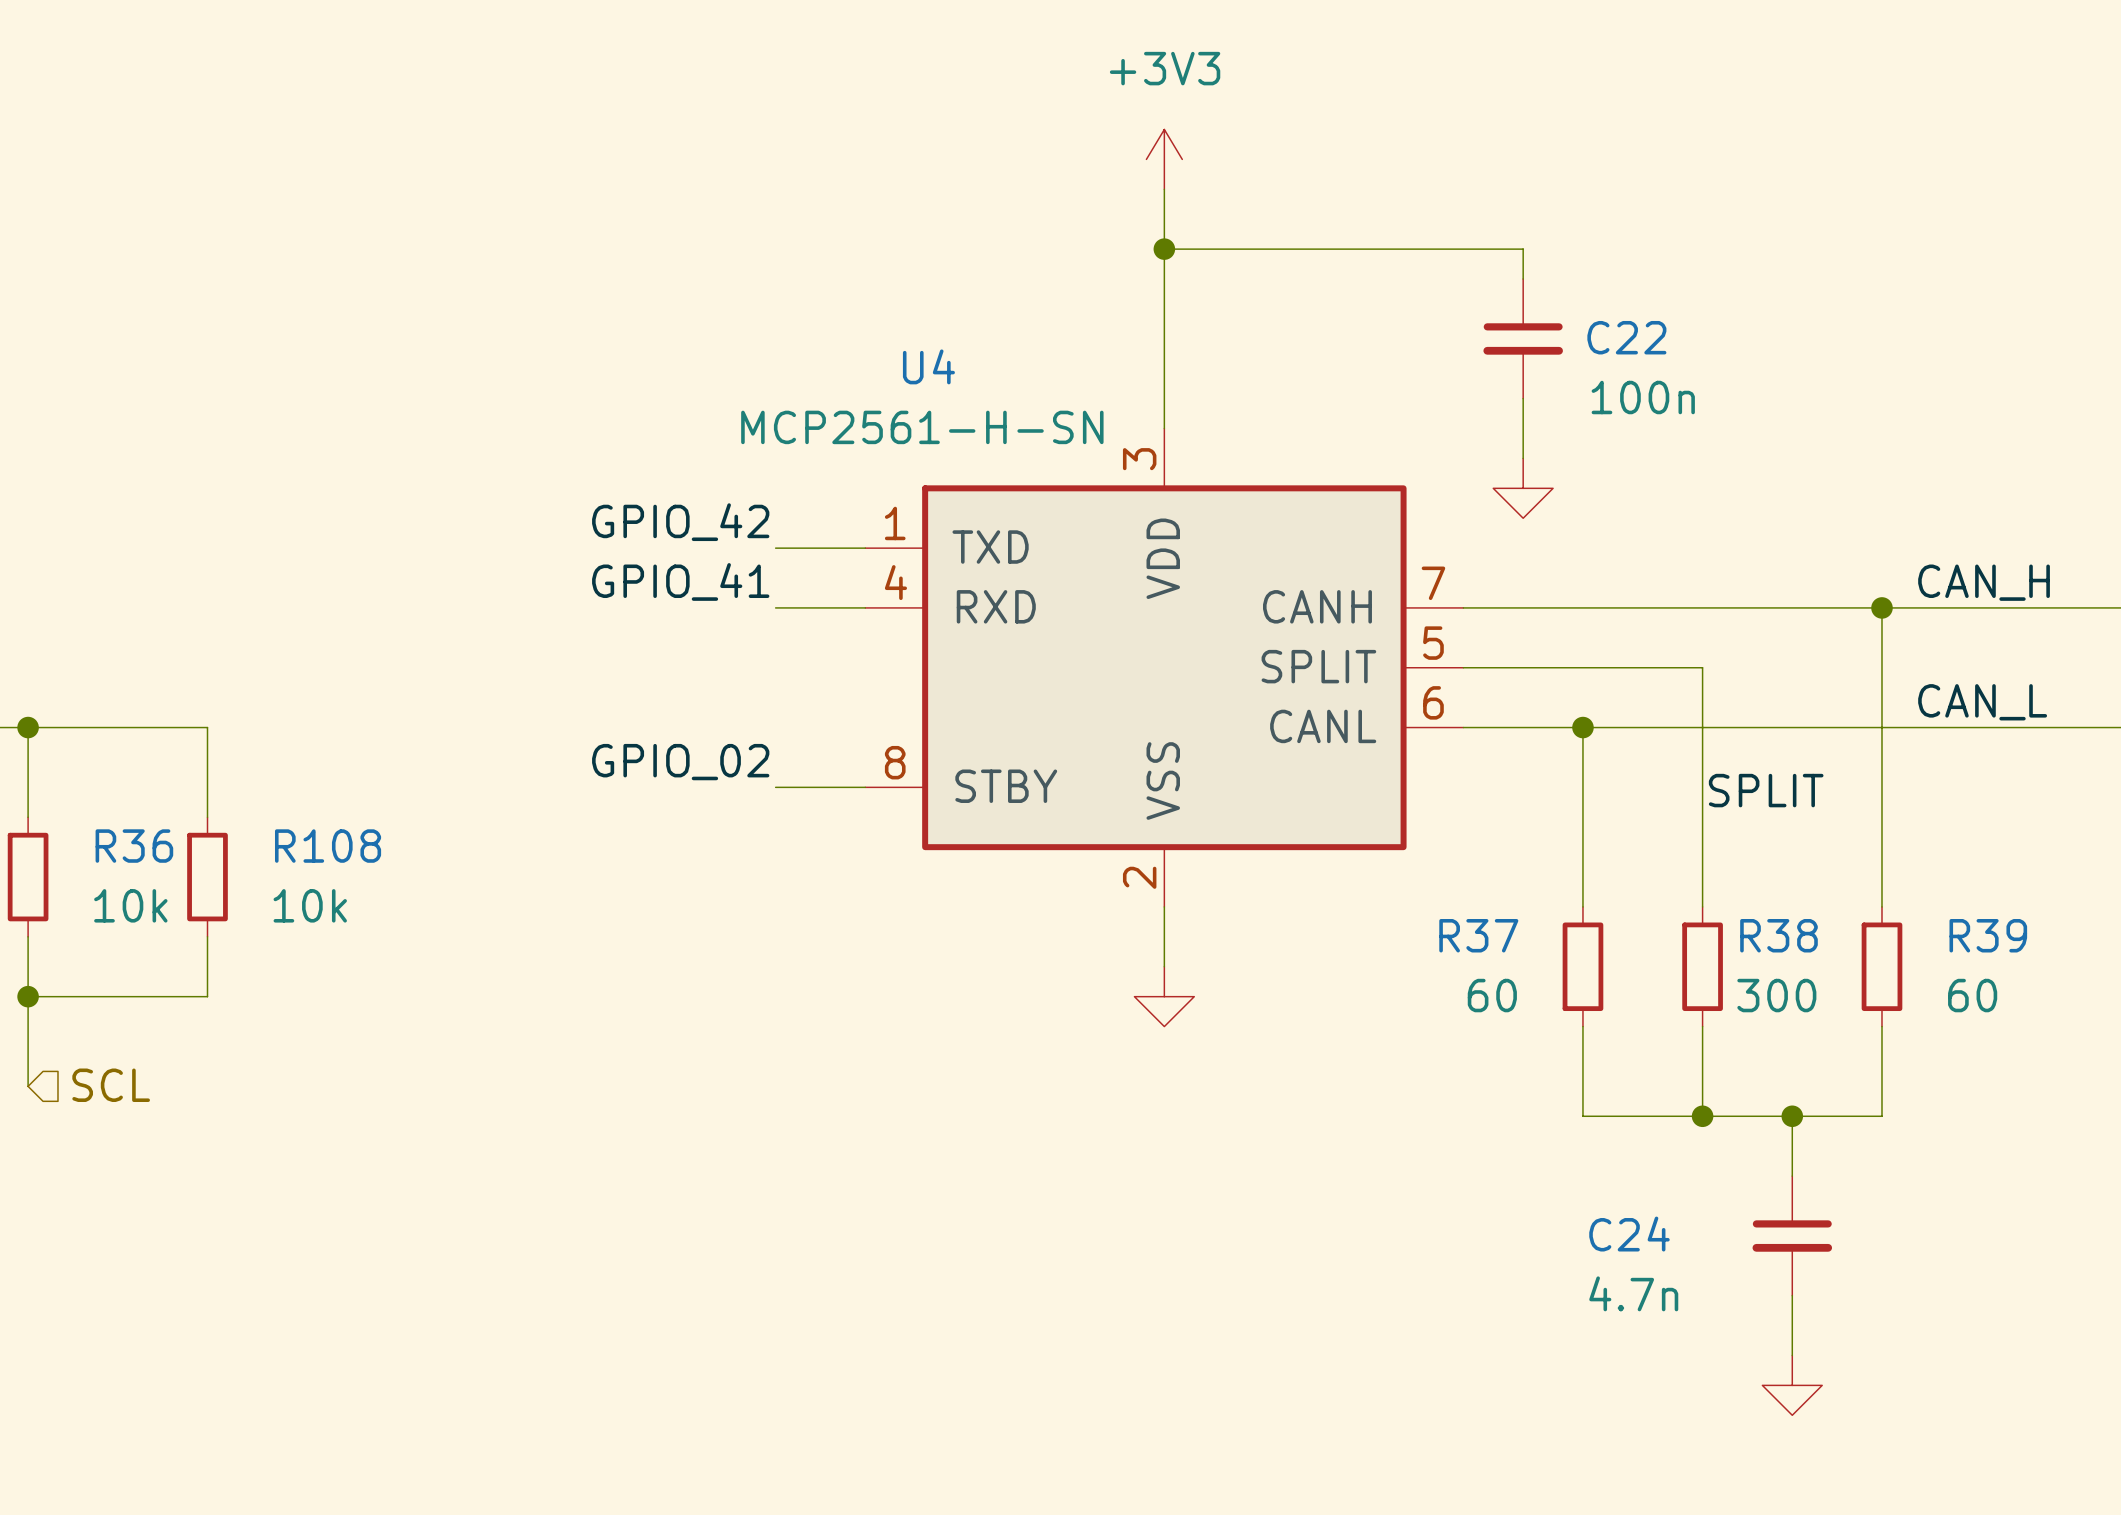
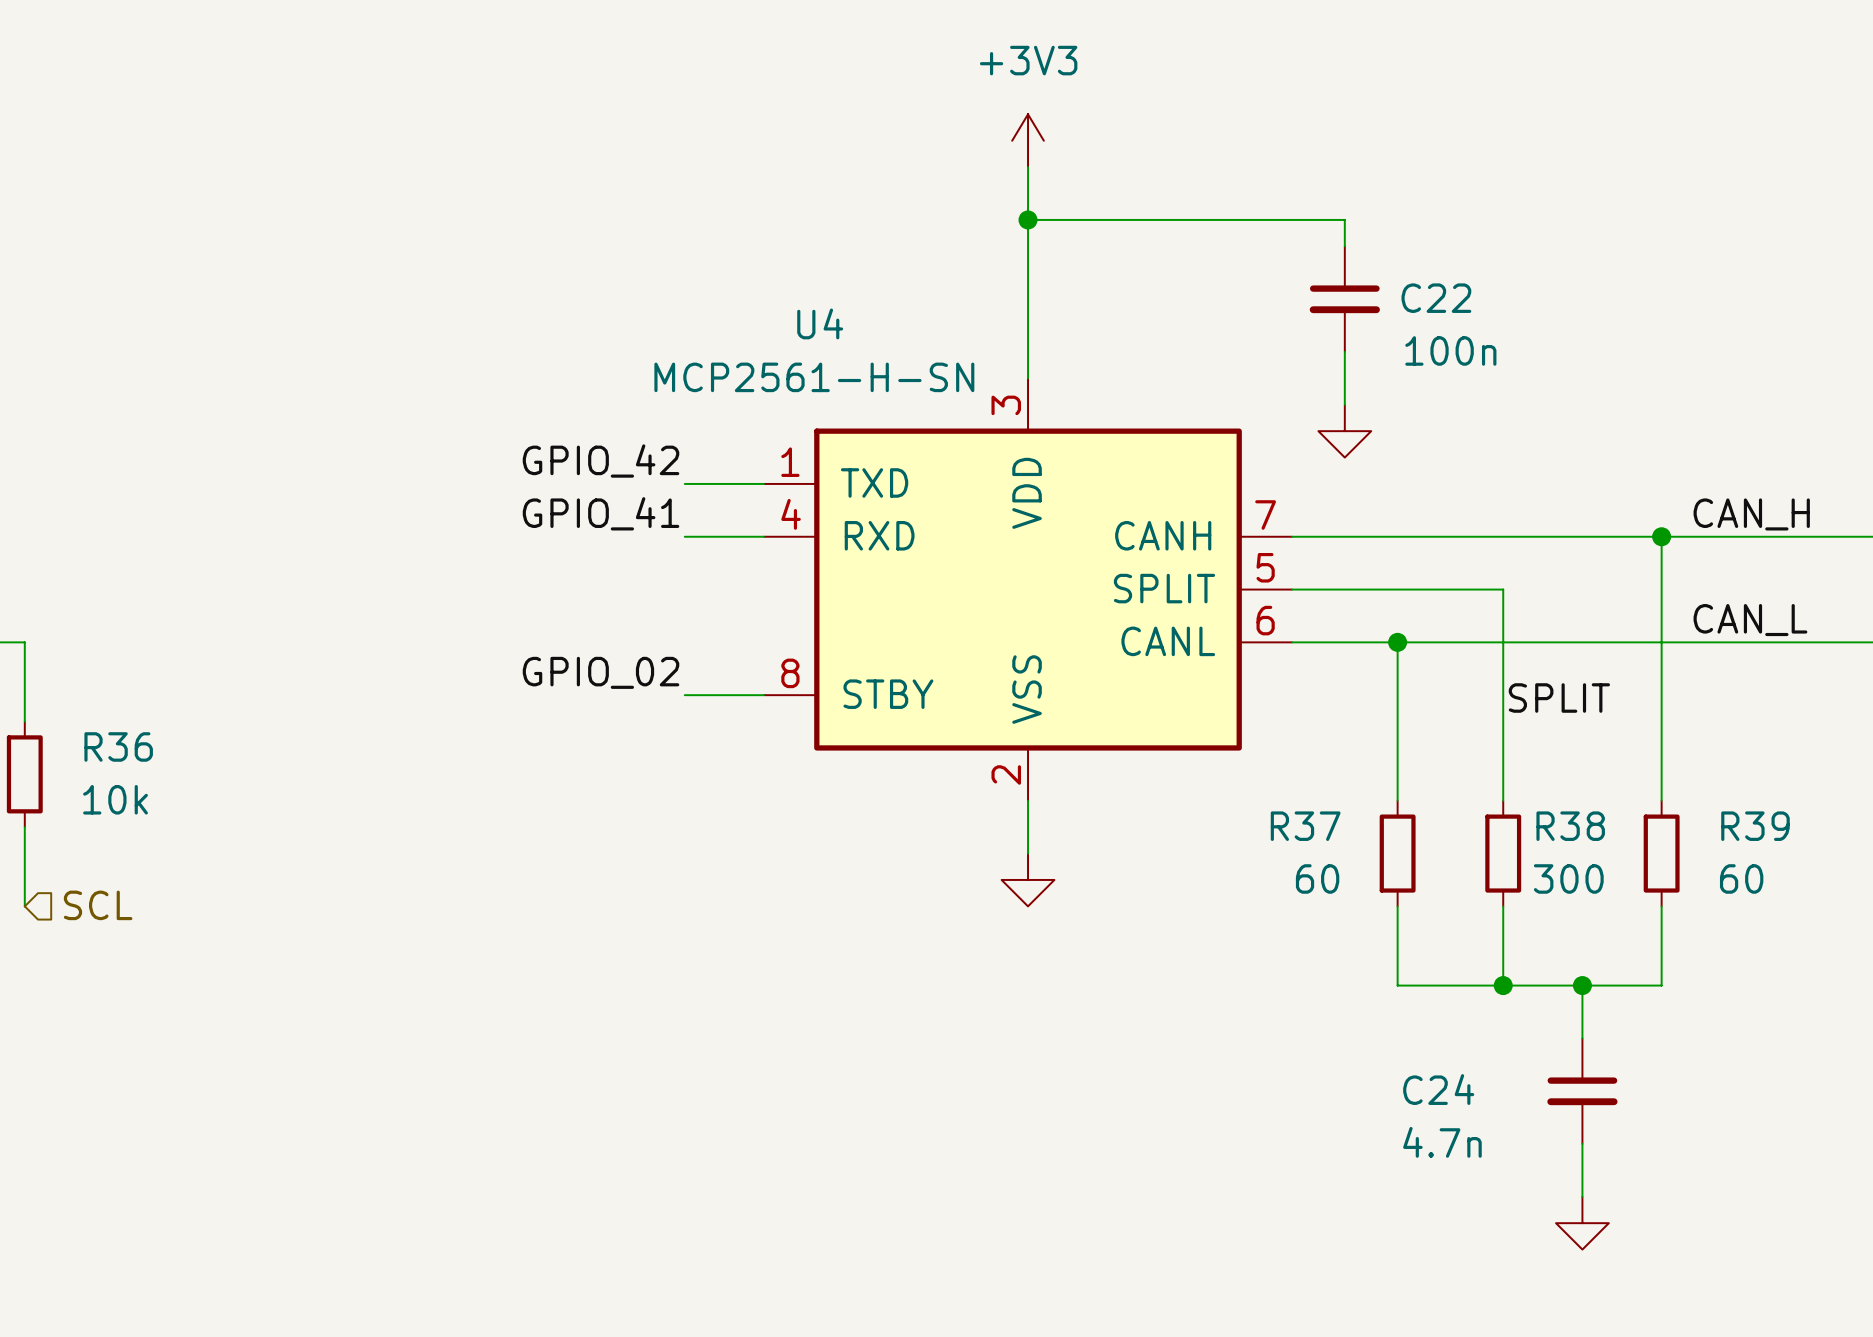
wire: (28, 727) (207, 727) (207, 817) -> none
junction: (28, 727) -> none
R108: 10k (207, 877) -> none
wire: (207, 936) (207, 996) (28, 996) -> none
junction: (28, 996) -> none
wire: (28, 1026) (28, 1086) -> none
hierarchical label position: SCL (111, 1085) -> SCL (98, 905)

